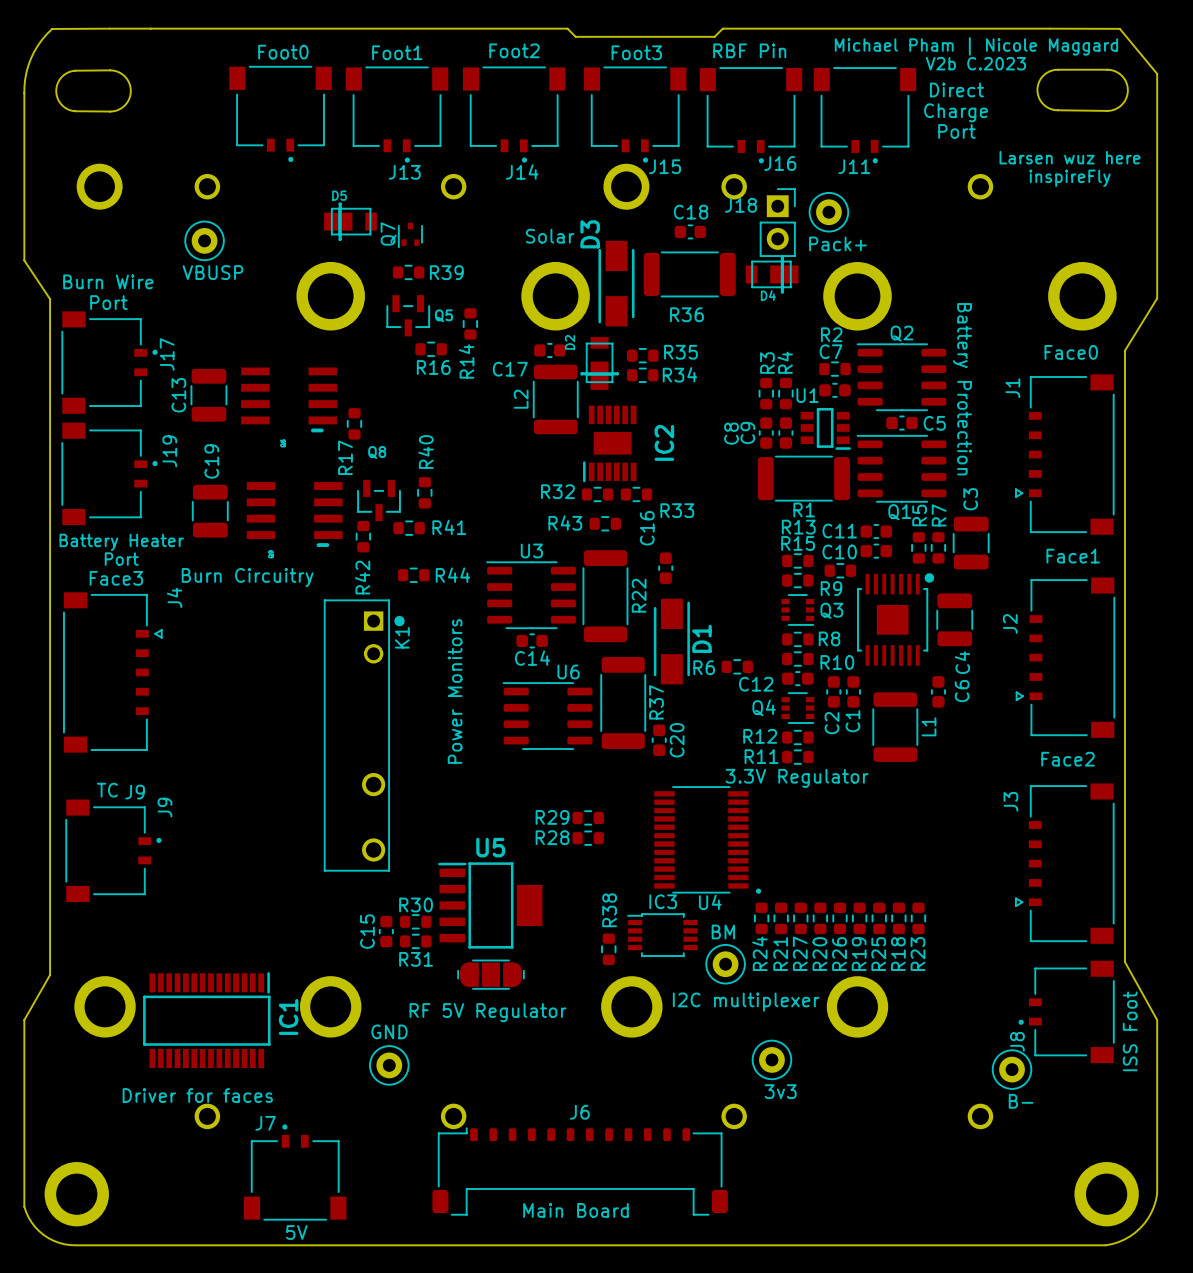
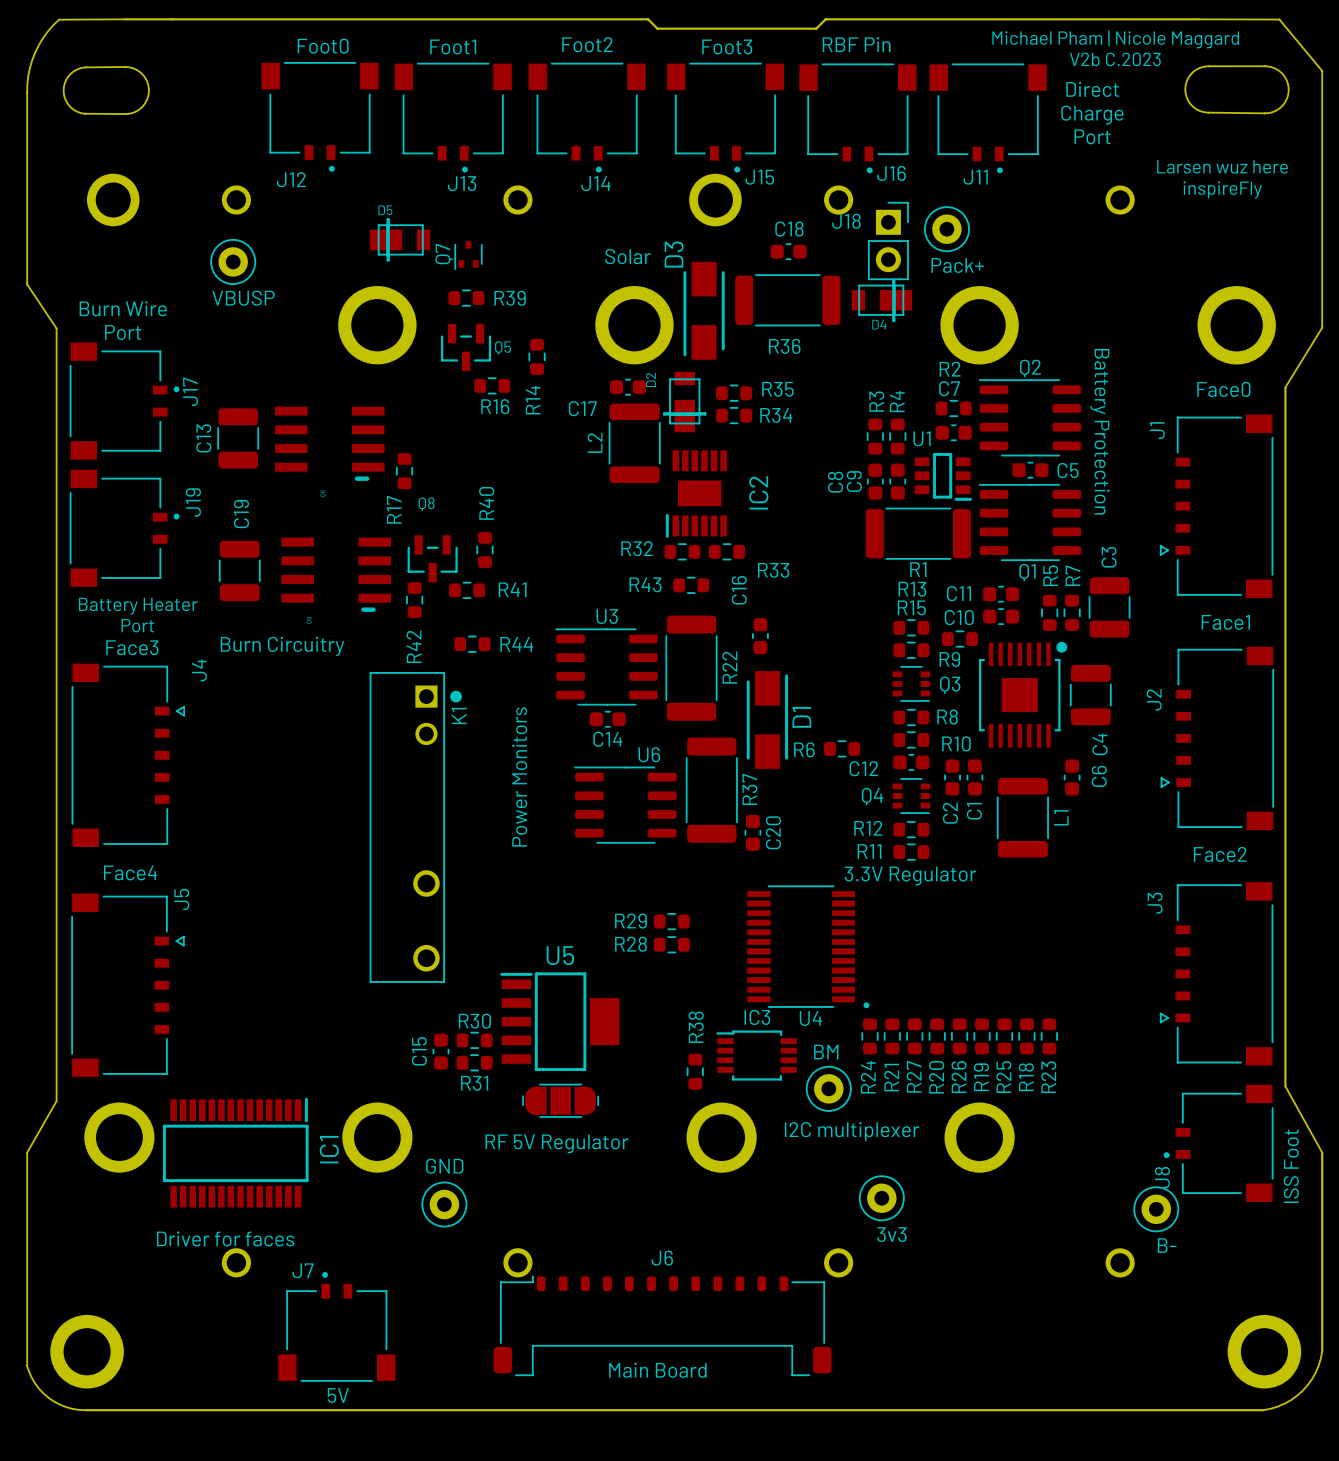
text: none -> Face4 (130, 872)
text: TC (107, 790) -> none
J9 name: J9 (164, 807) -> J12 (291, 179)
J9: (113, 850) -> none
J5: none -> (127, 985)

